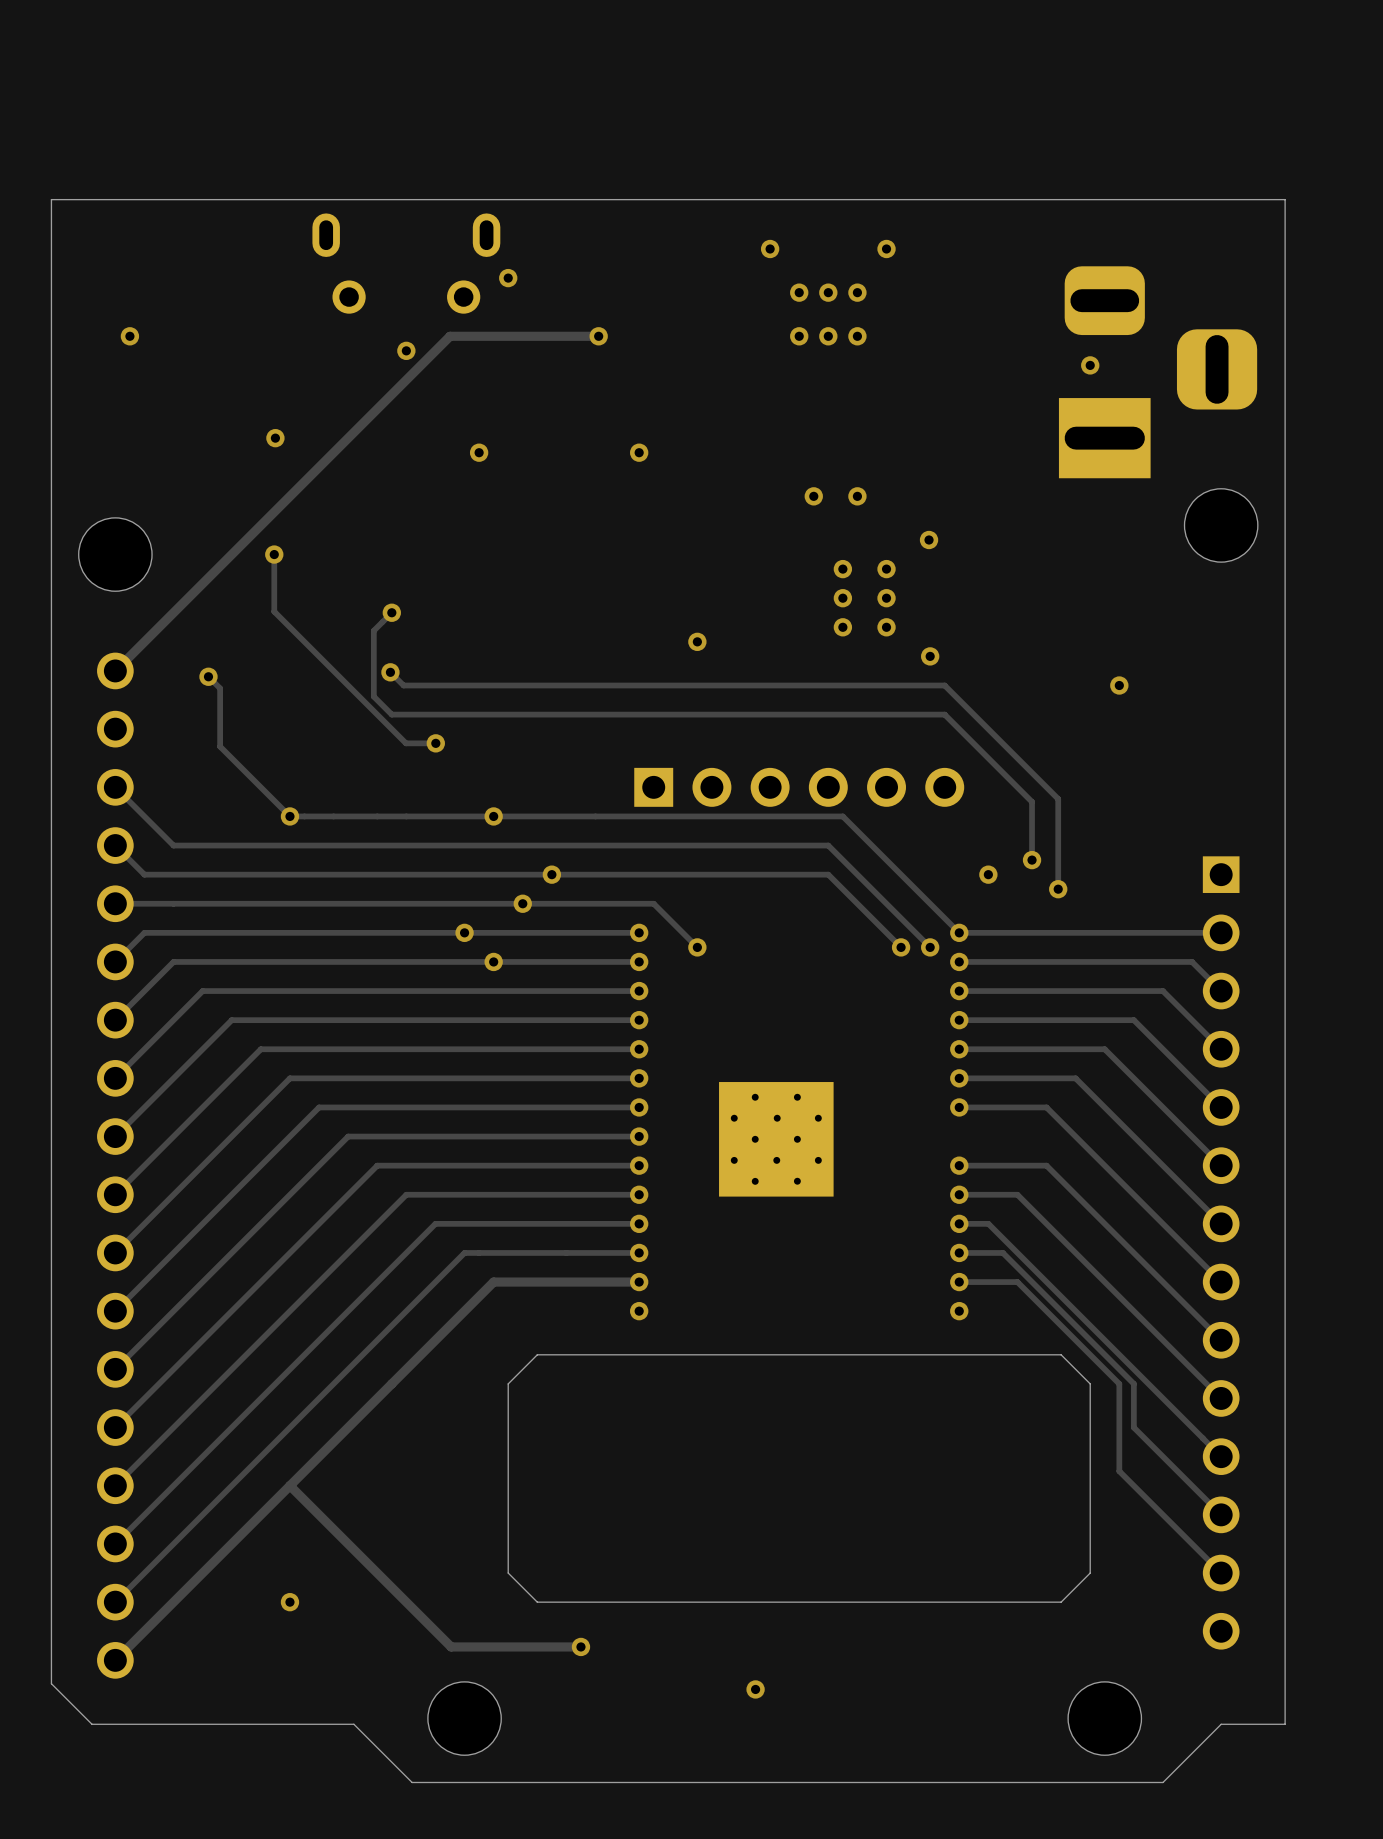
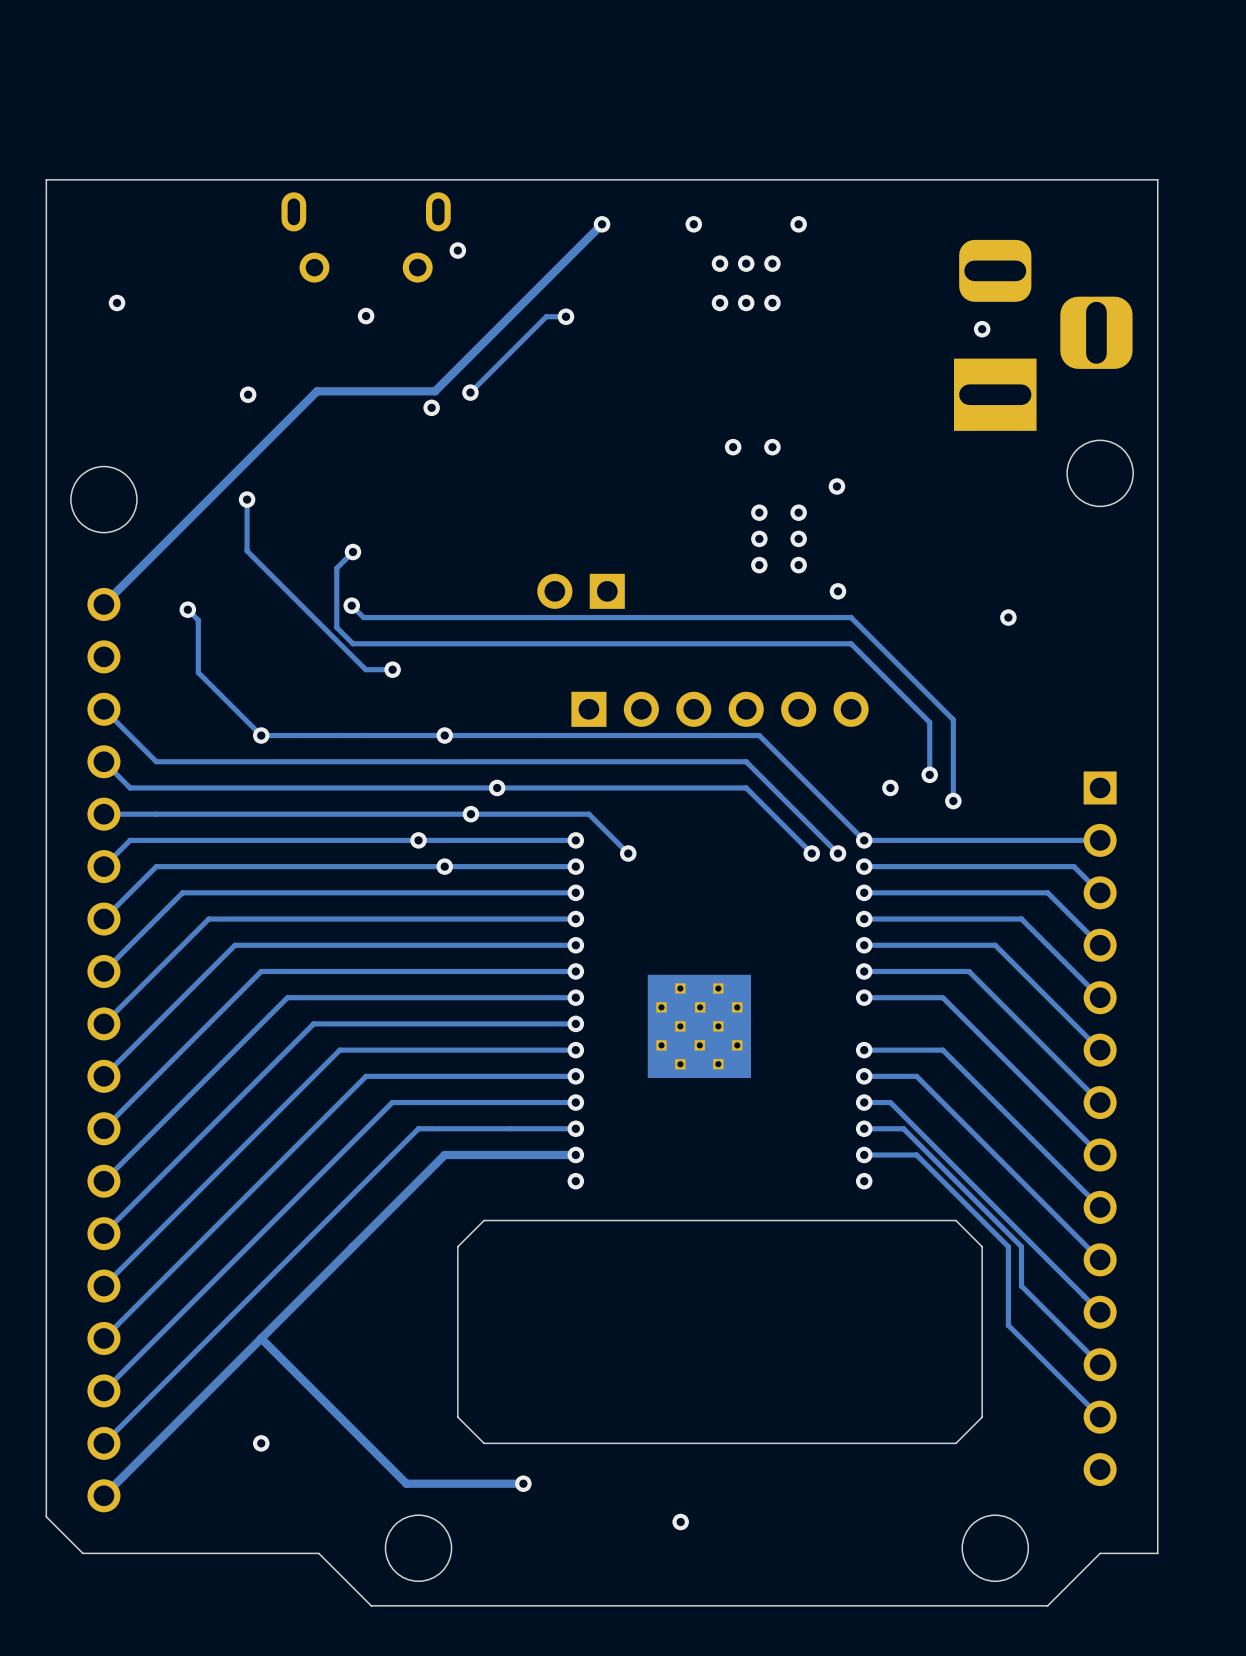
via: none -> (602, 224)
track: (598, 336) (450, 336) (351, 434) -> (602, 224) (435, 391) (317, 391)
via position: (598, 336) -> (566, 316)
track: none -> (566, 316) (546, 316) (470, 392)
via: none -> (470, 392)
via: (639, 452) -> none
via: (697, 641) -> none
part: none -> (581, 591)

